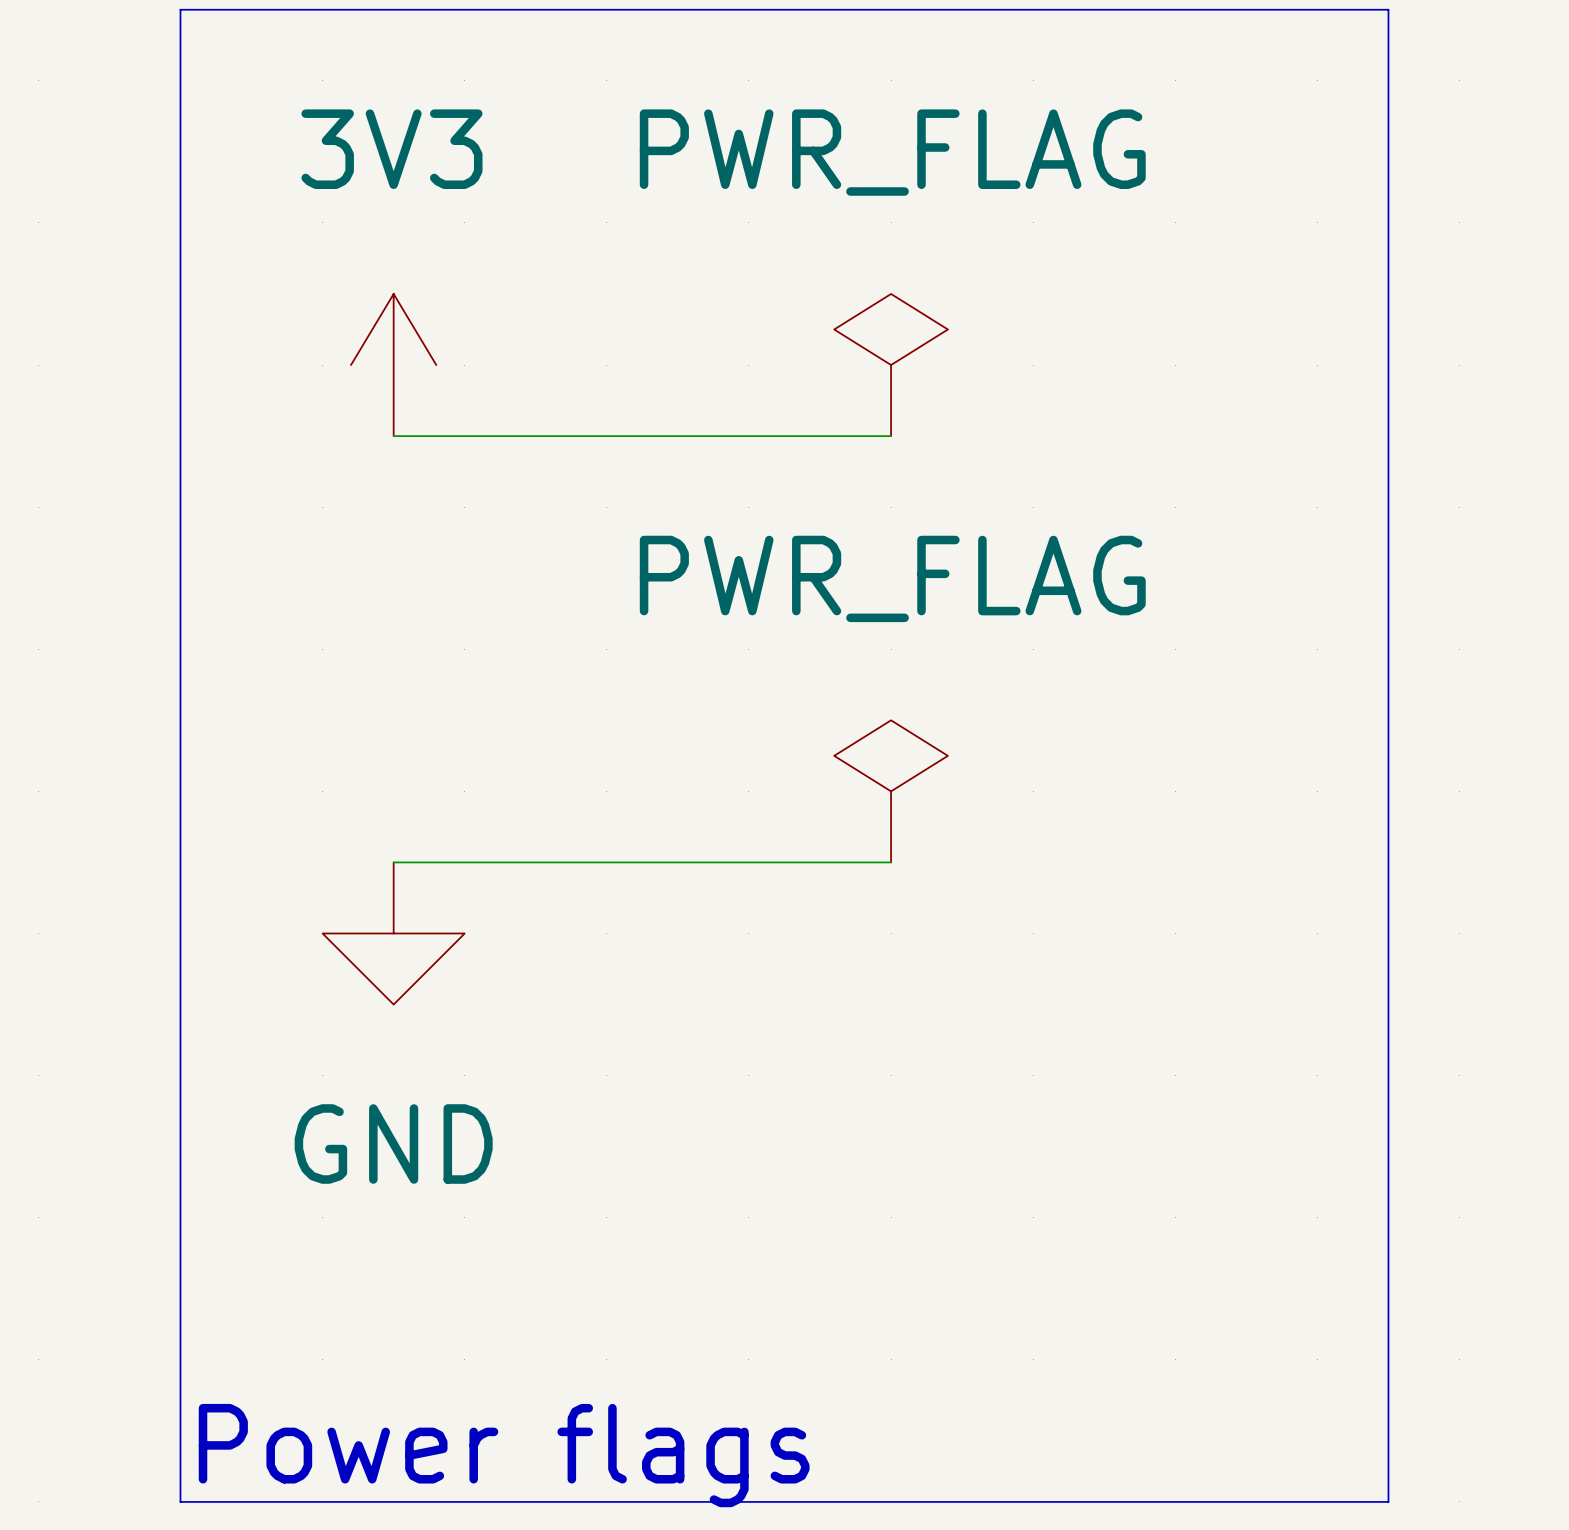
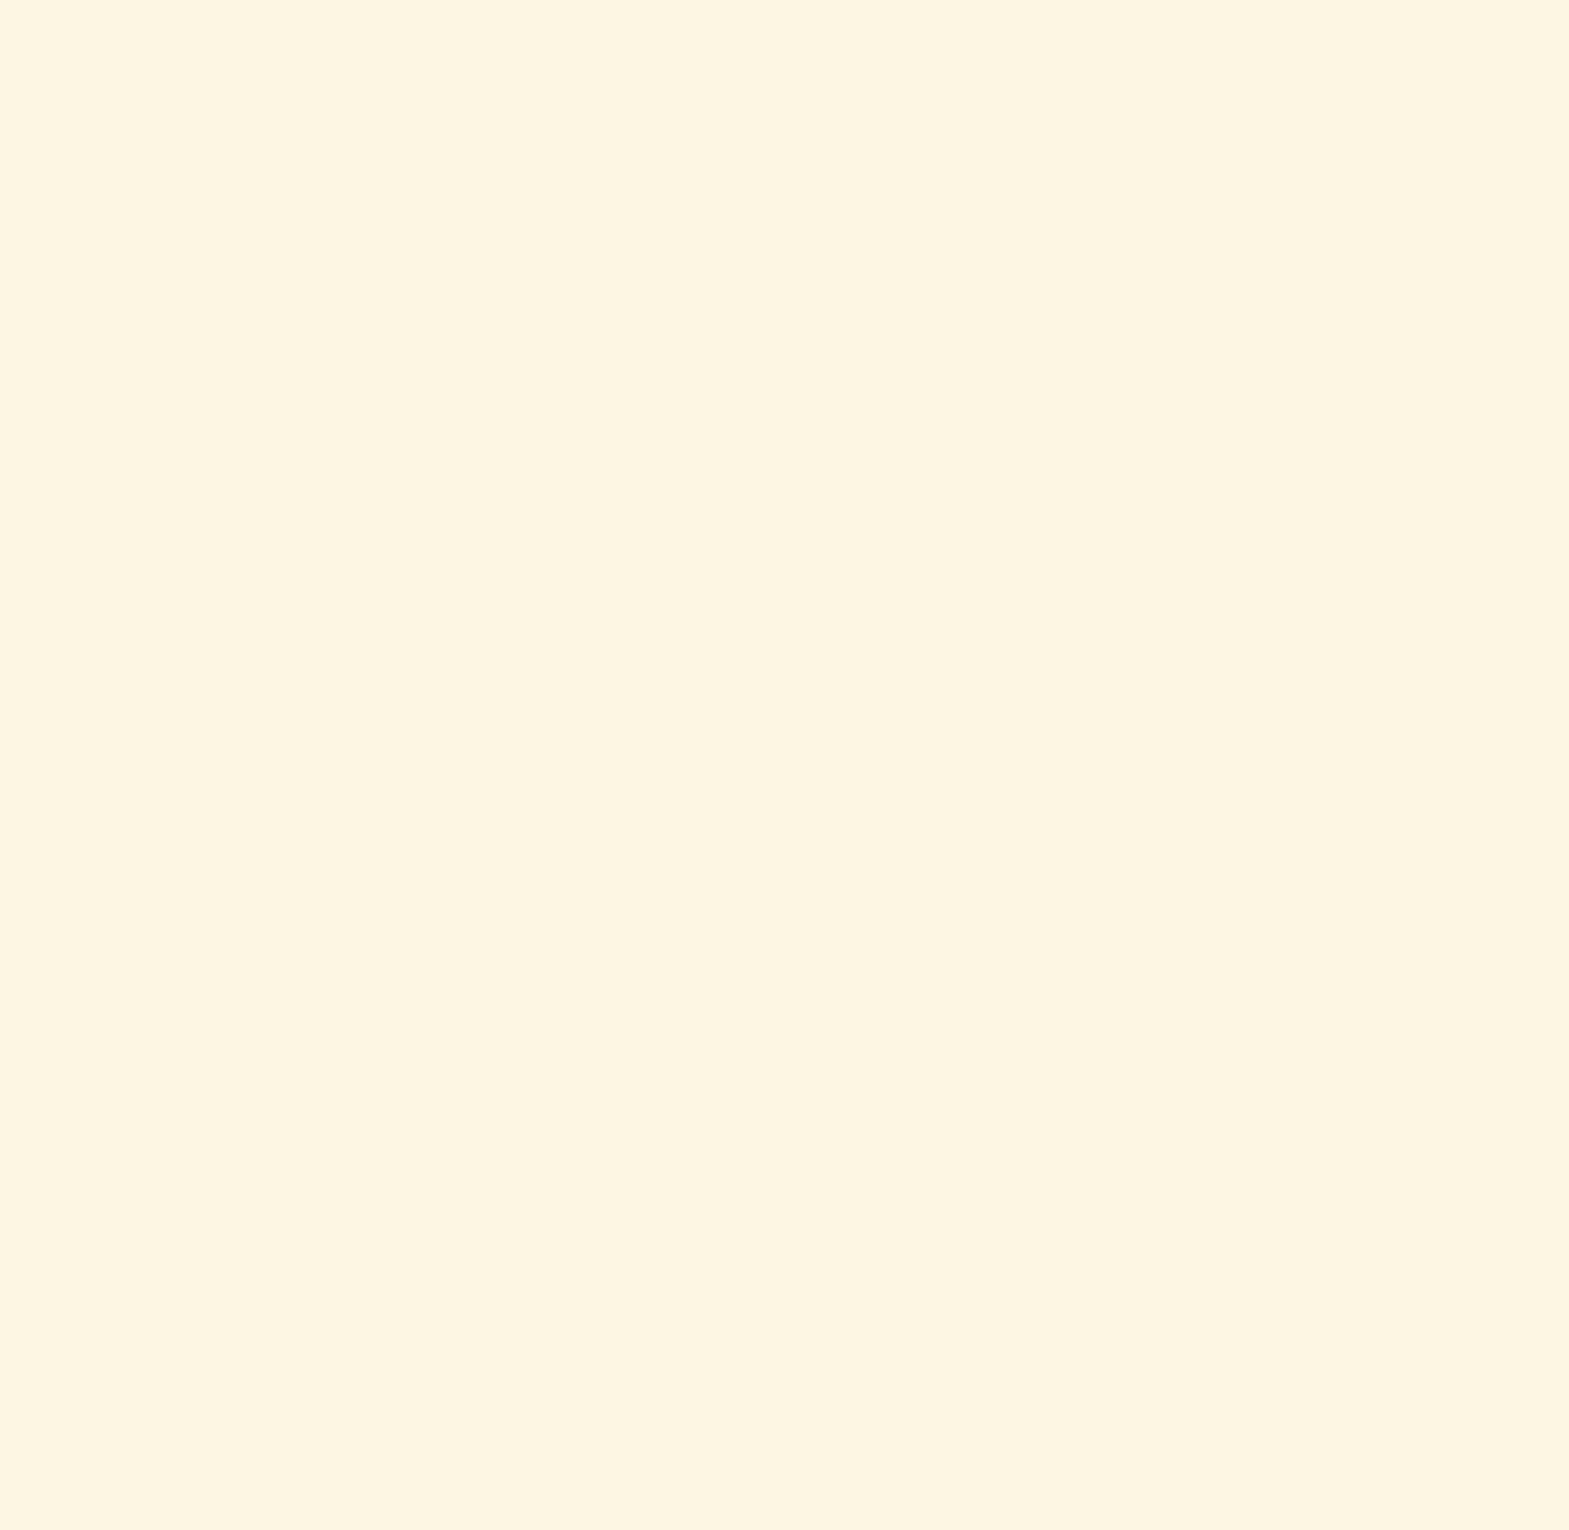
line: (180, 9) (1388, 9) (1388, 1501) (180, 1501) (180, 9) -> none
power symbol: 3V3 (393, 365) -> none
power symbol: PWR_FLAG (891, 365) -> none
wire: (393, 436) (891, 436) -> none
power symbol: PWR_FLAG (891, 791) -> none
wire: (393, 862) (891, 862) -> none
power symbol: GND (393, 933) -> none
text: Power flags (504, 1455) -> none

